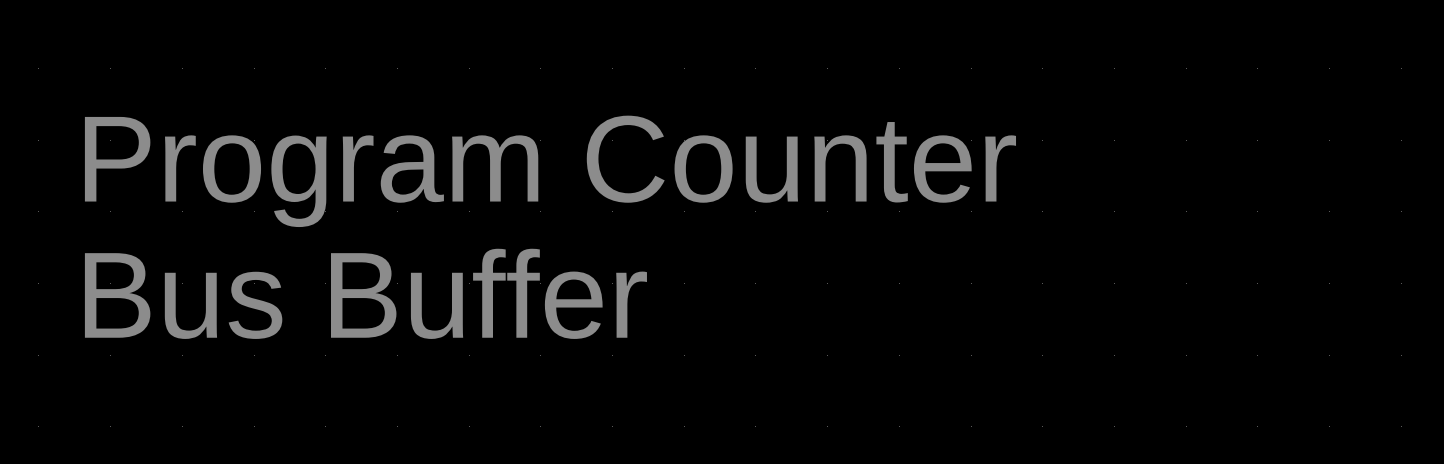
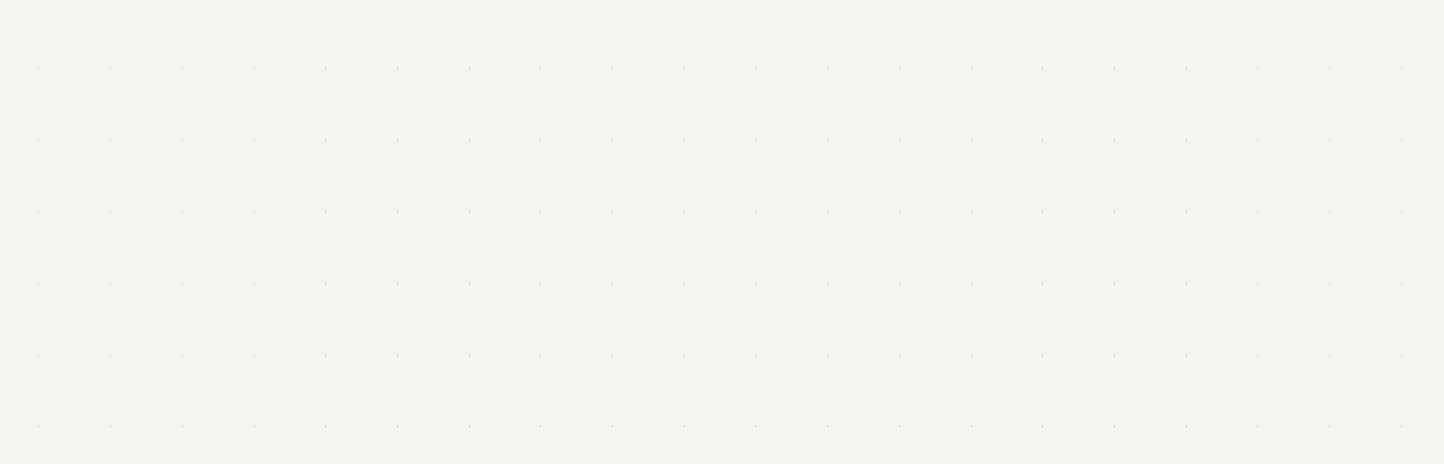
text: Program Counter (550, 171) -> none
text: Bus Buffer (365, 293) -> none

